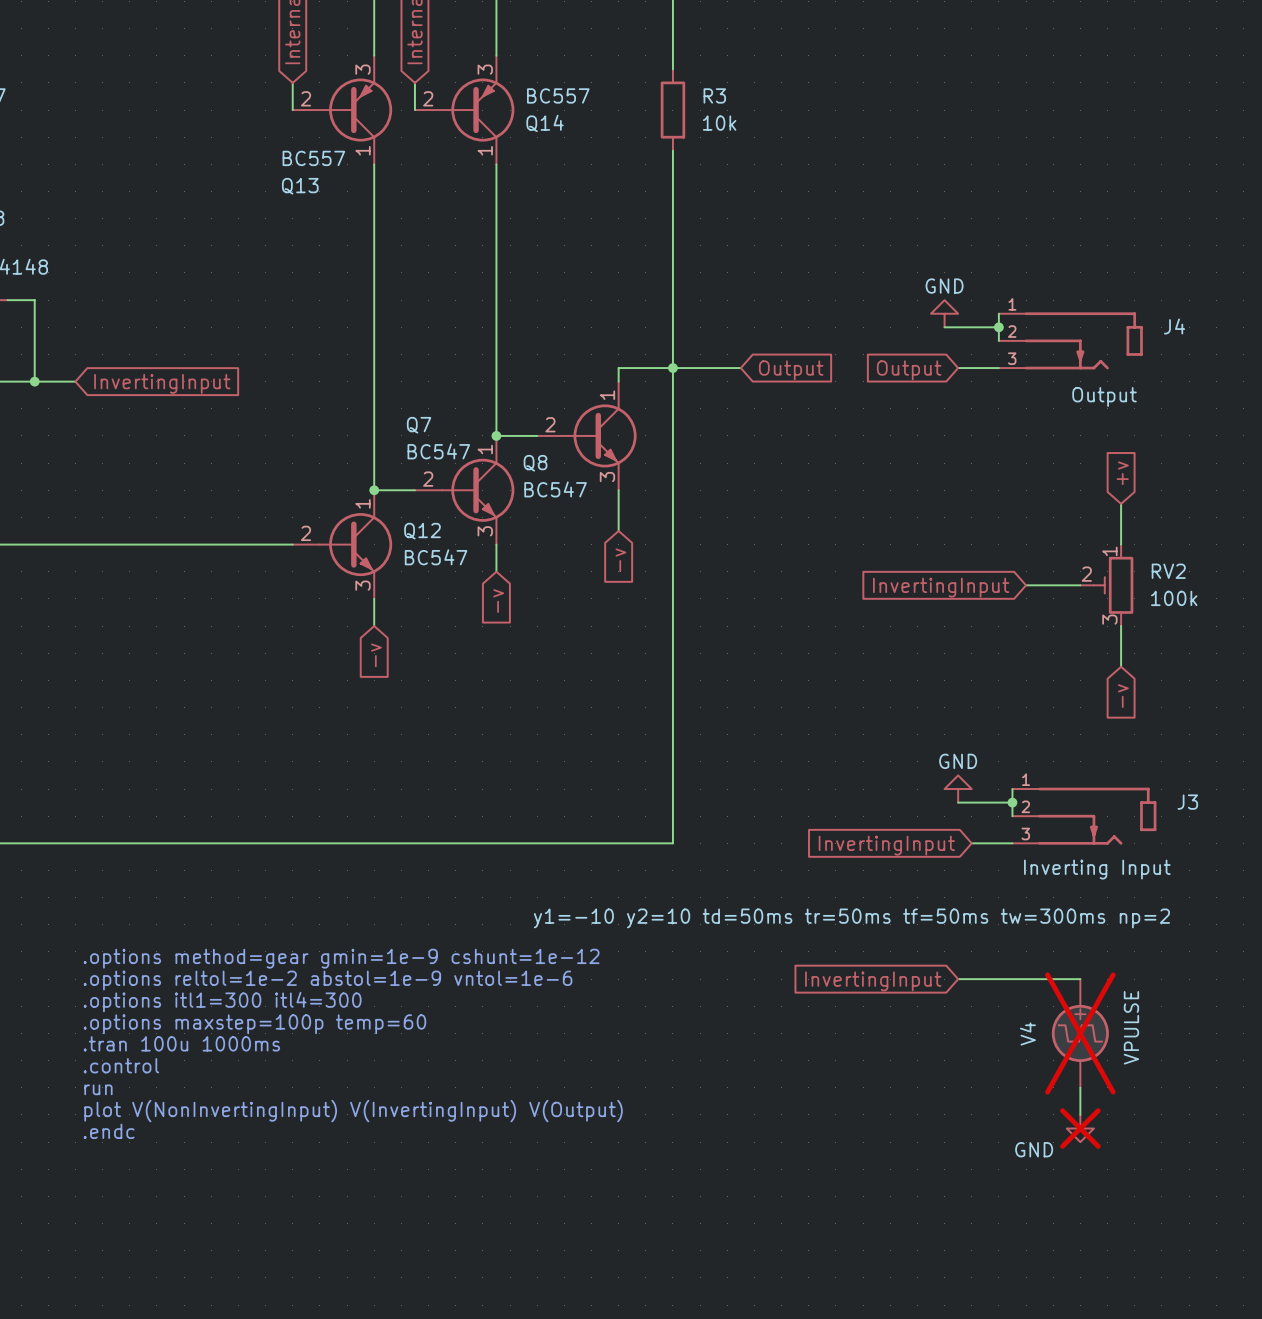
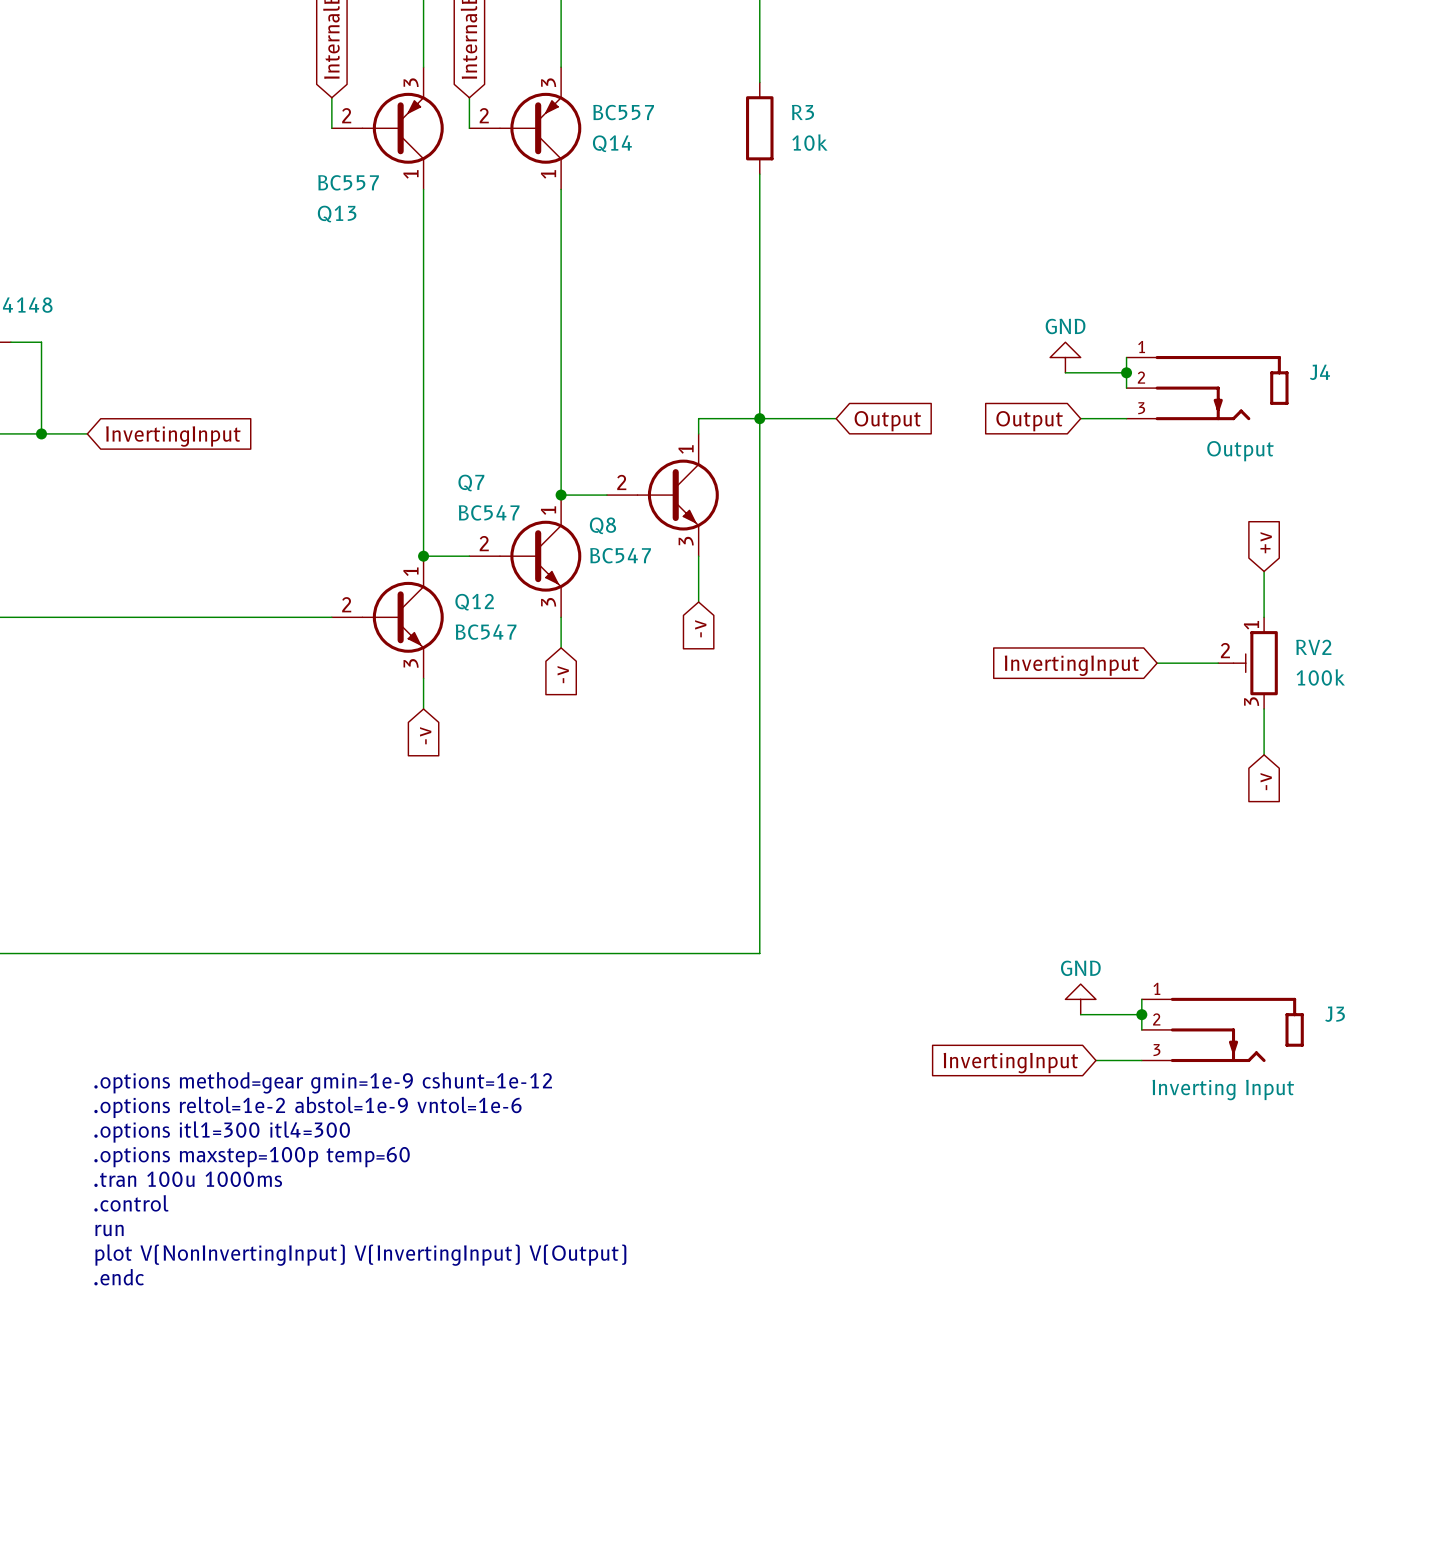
power symbol position: GND (958, 789) -> GND (1080, 999)
wire: (1012, 789) (1012, 816) -> (1141, 999) (1141, 1029)
wire: (958, 802) (1012, 802) -> (1080, 1014) (1141, 1014)
junction: (1012, 802) -> none
J3 position: (1084, 816) -> (1222, 1029)
wire: (971, 843) (1012, 843) -> (1095, 1060) (1141, 1060)
global label: InvertingInput (886, 845) -> none
junction: none -> (1141, 1014)
wire: (958, 979) (1080, 979) -> none
global label position: InvertingInput (873, 981) -> InvertingInput (1010, 1063)
V4: VPULSE (1080, 1033) -> none
wire: (1080, 1087) (1080, 1114) -> none
power symbol: GND (1080, 1128) -> none

